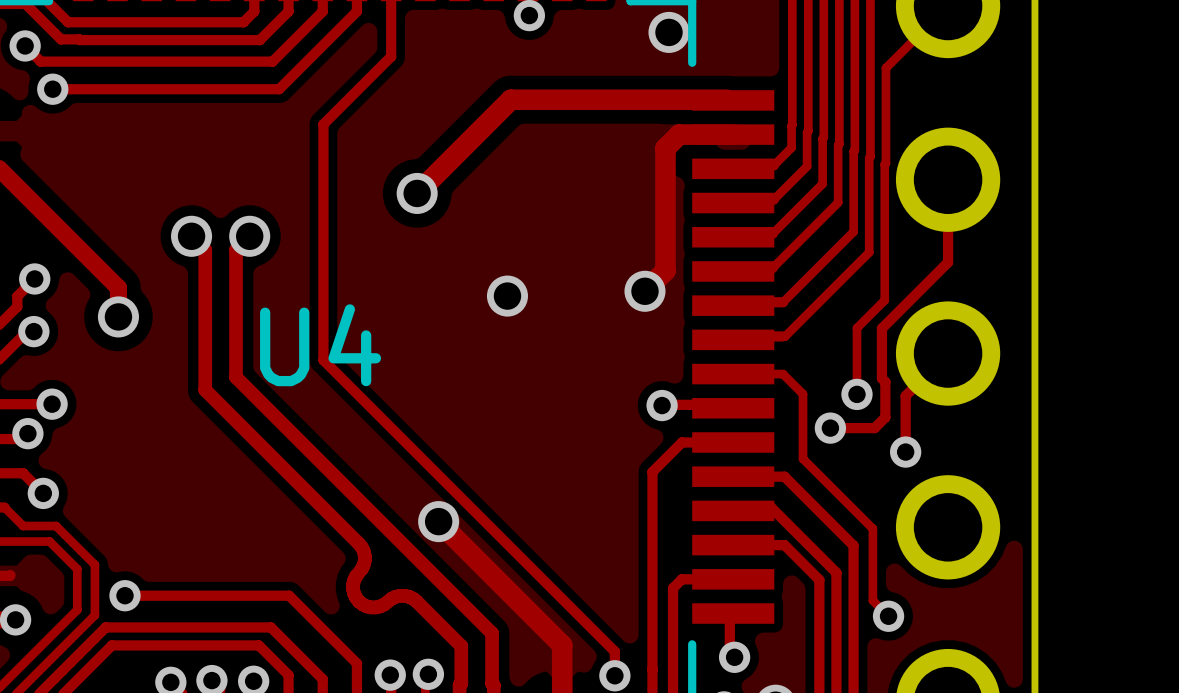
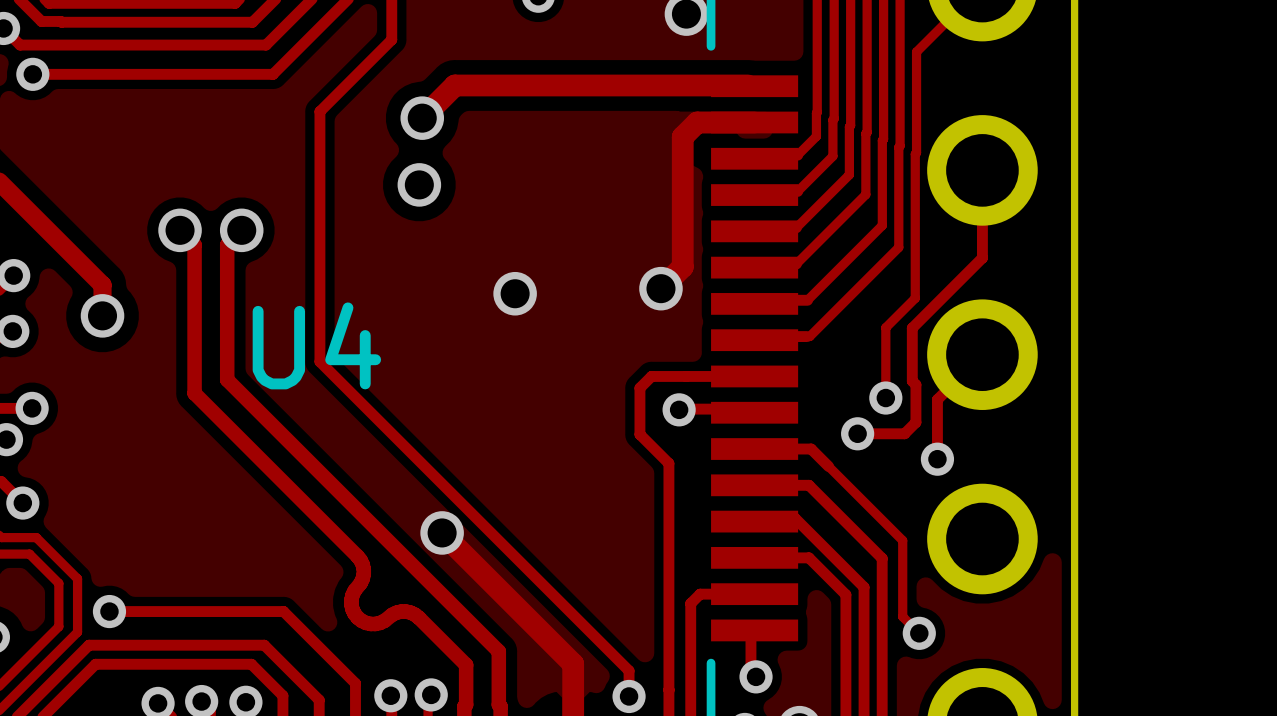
track: (510, 99) (417, 193) -> (518, 85) (454, 85) (422, 118)
via: none -> (422, 118)
track: (733, 374) (782, 374) (803, 394) (803, 458) -> (754, 449) (811, 449) (828, 466)
track: (733, 442) (681, 442) (652, 471) -> (754, 376) (651, 376) (639, 388) (639, 434) (668, 463) (668, 480)

